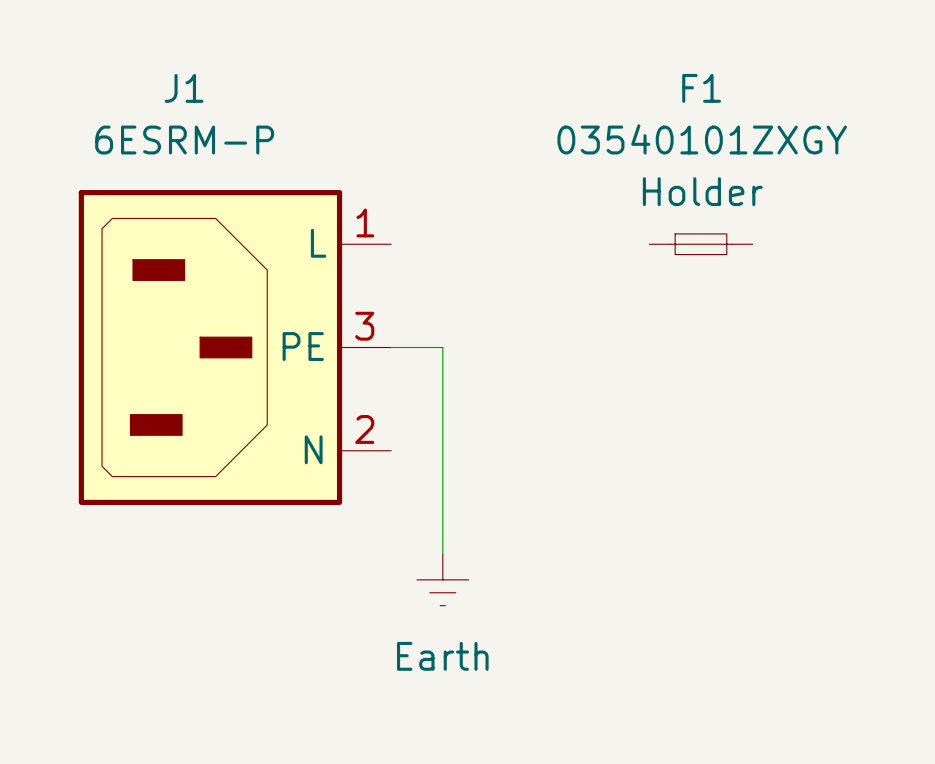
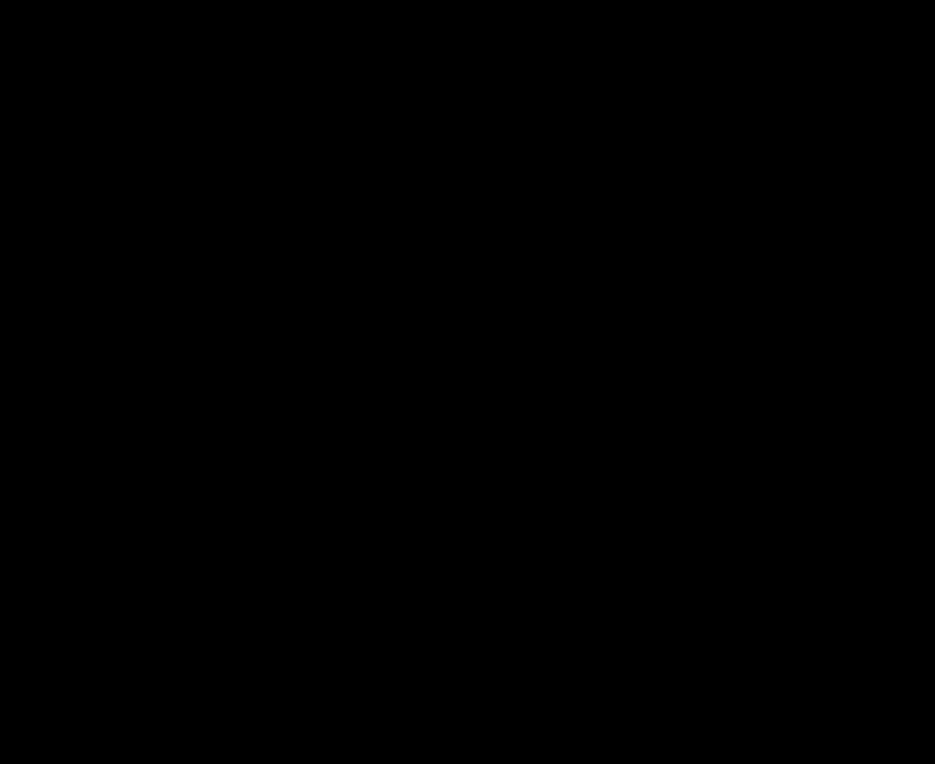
F1: 03540101ZXGY (700, 244) -> none
J1: 6ESRM-P (234, 347) -> none
wire: (391, 347) (442, 347) (442, 554) -> none
power symbol: Earth (442, 579) -> none

